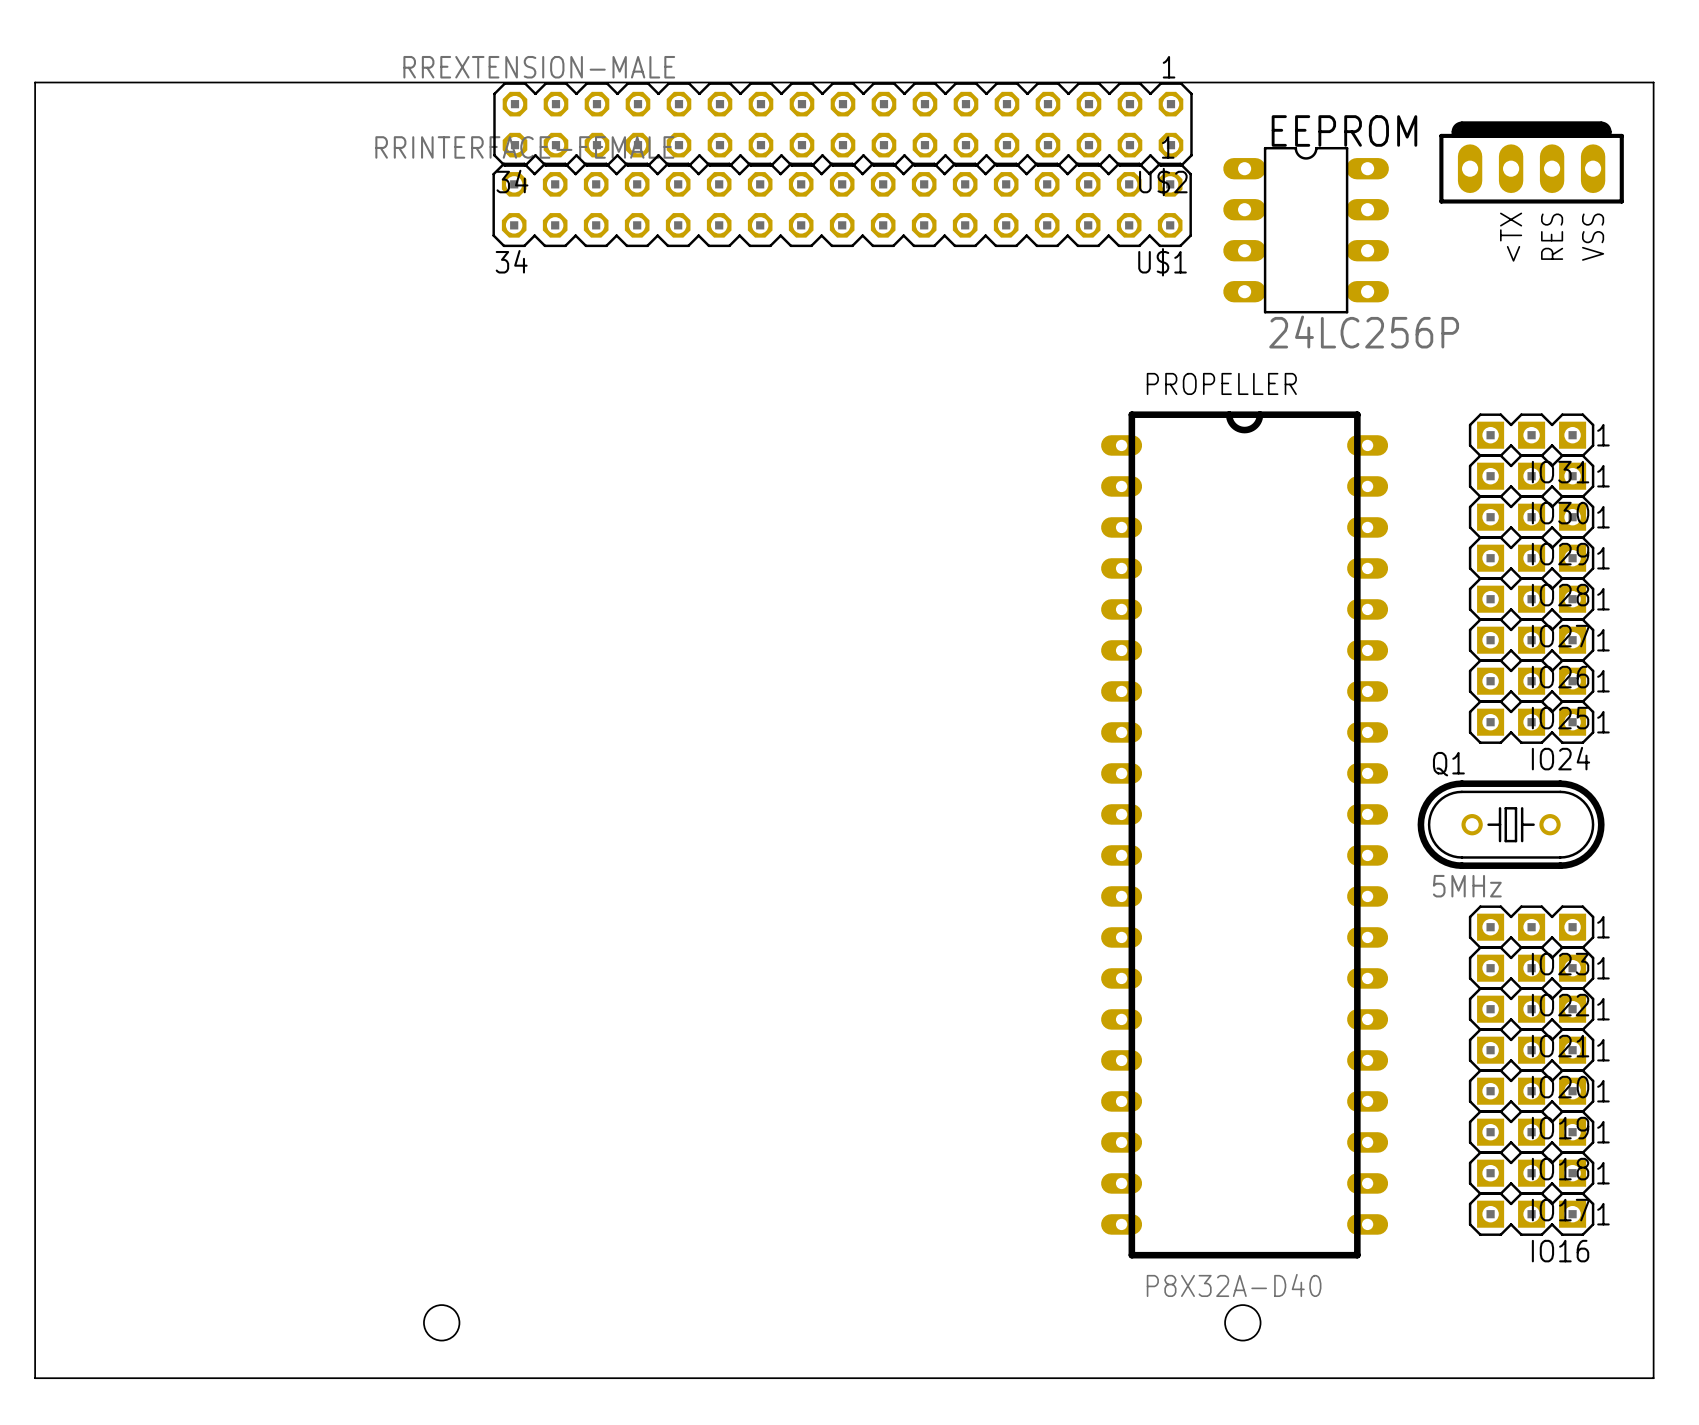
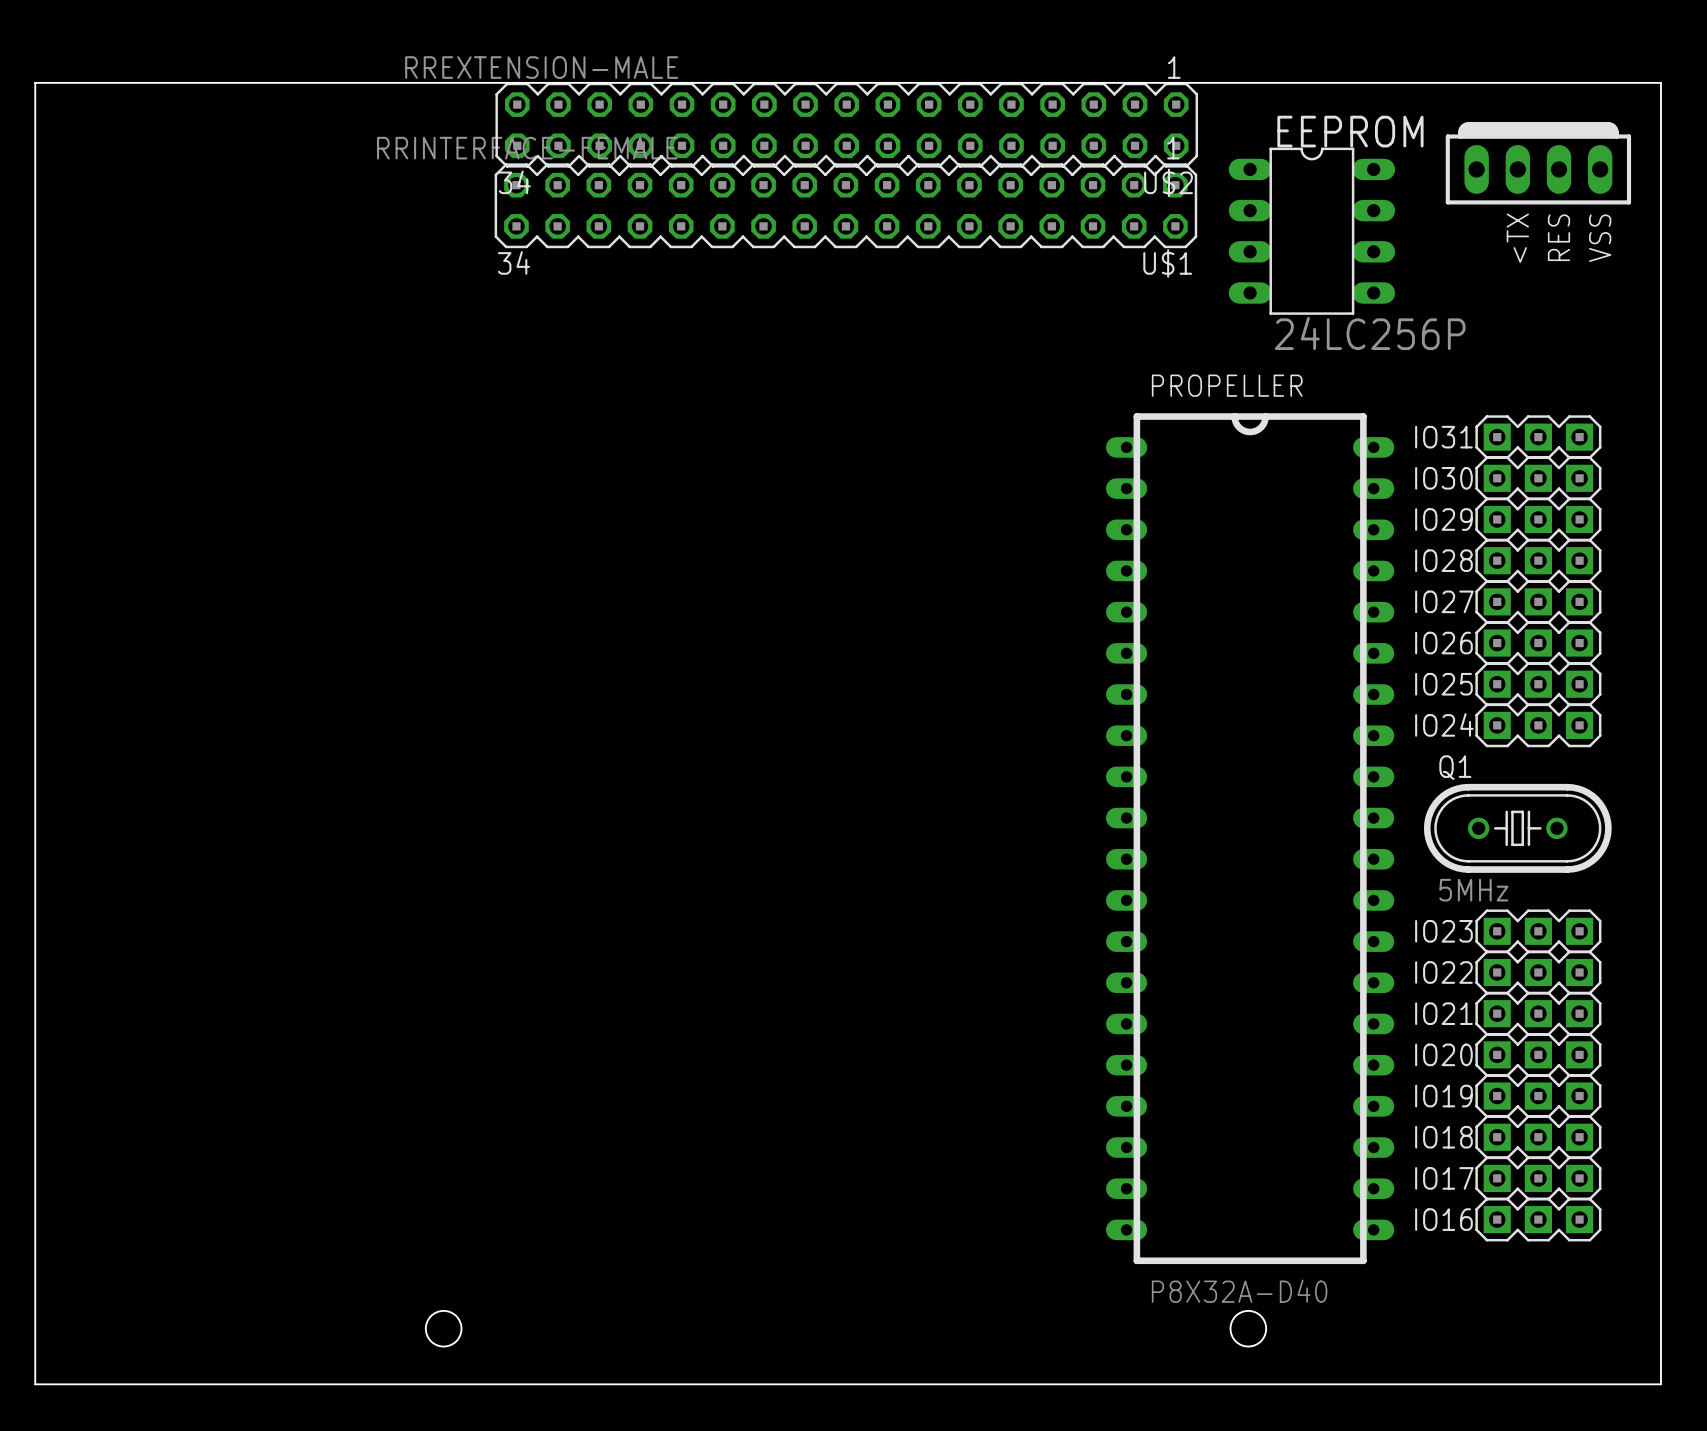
IO31 text: 1 (1603, 435) -> none
IO31 name position: IO31 (1560, 472) -> IO31 (1443, 437)
IO30 text: 1 (1603, 476) -> none
IO30 name position: IO30 (1560, 513) -> IO30 (1443, 478)
IO29 text: 1 (1603, 517) -> none
IO29 name position: IO29 (1560, 554) -> IO29 (1443, 519)
IO28 text: 1 (1603, 558) -> none
IO28 name position: IO28 (1560, 595) -> IO28 (1443, 560)
IO27 text: 1 (1603, 599) -> none
IO27 name position: IO27 (1560, 636) -> IO27 (1444, 601)
IO26 text: 1 (1603, 640) -> none
IO26 name position: IO26 (1560, 677) -> IO26 (1443, 643)
IO25 text: 1 (1603, 681) -> none
IO25 name position: IO25 (1560, 718) -> IO25 (1443, 684)
IO24 text: 1 (1603, 722) -> none
IO24 name position: IO24 (1560, 758) -> IO24 (1444, 724)
IO23 text: 1 (1603, 927) -> none
IO23 name position: IO23 (1560, 964) -> IO23 (1443, 931)
IO22 text: 1 (1603, 968) -> none
IO22 name position: IO22 (1560, 1005) -> IO22 (1443, 972)
IO21 text: 1 (1603, 1009) -> none
IO21 name position: IO21 (1560, 1046) -> IO21 (1443, 1013)
IO20 text: 1 (1603, 1050) -> none
IO20 name position: IO20 (1560, 1087) -> IO20 (1443, 1054)
IO19 text: 1 (1603, 1091) -> none
IO19 name position: IO19 (1560, 1128) -> IO19 (1443, 1096)
IO18 text: 1 (1603, 1132) -> none
IO18 name position: IO18 (1560, 1169) -> IO18 (1443, 1137)
IO17 text: 1 (1603, 1173) -> none
IO17 name position: IO17 (1560, 1210) -> IO17 (1444, 1178)
IO16 text: 1 (1603, 1214) -> none
IO16 name position: IO16 (1560, 1251) -> IO16 (1443, 1219)

